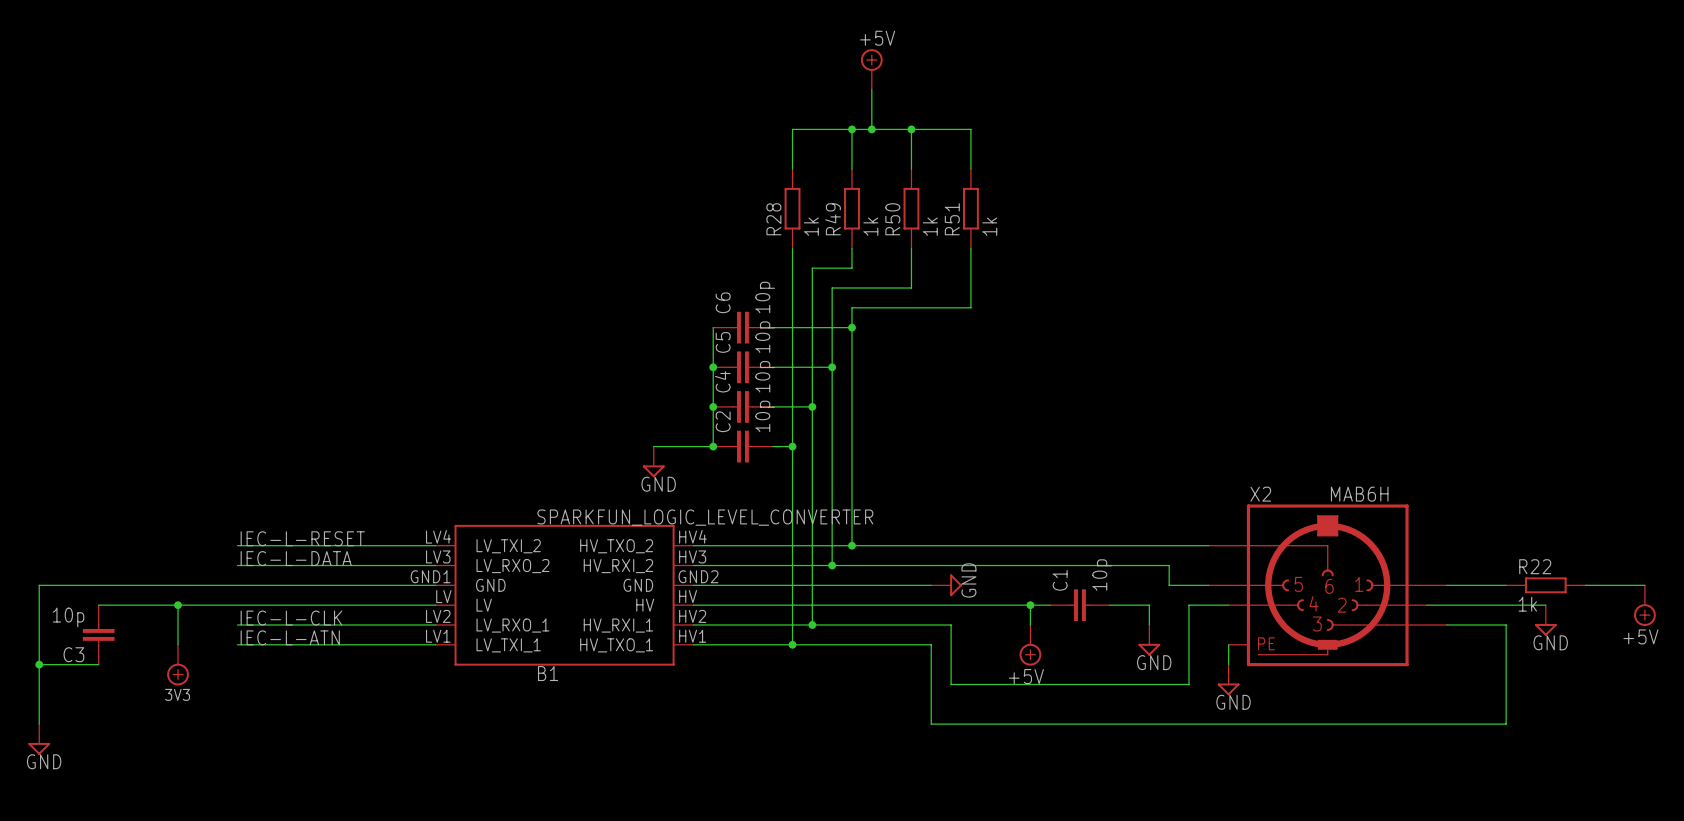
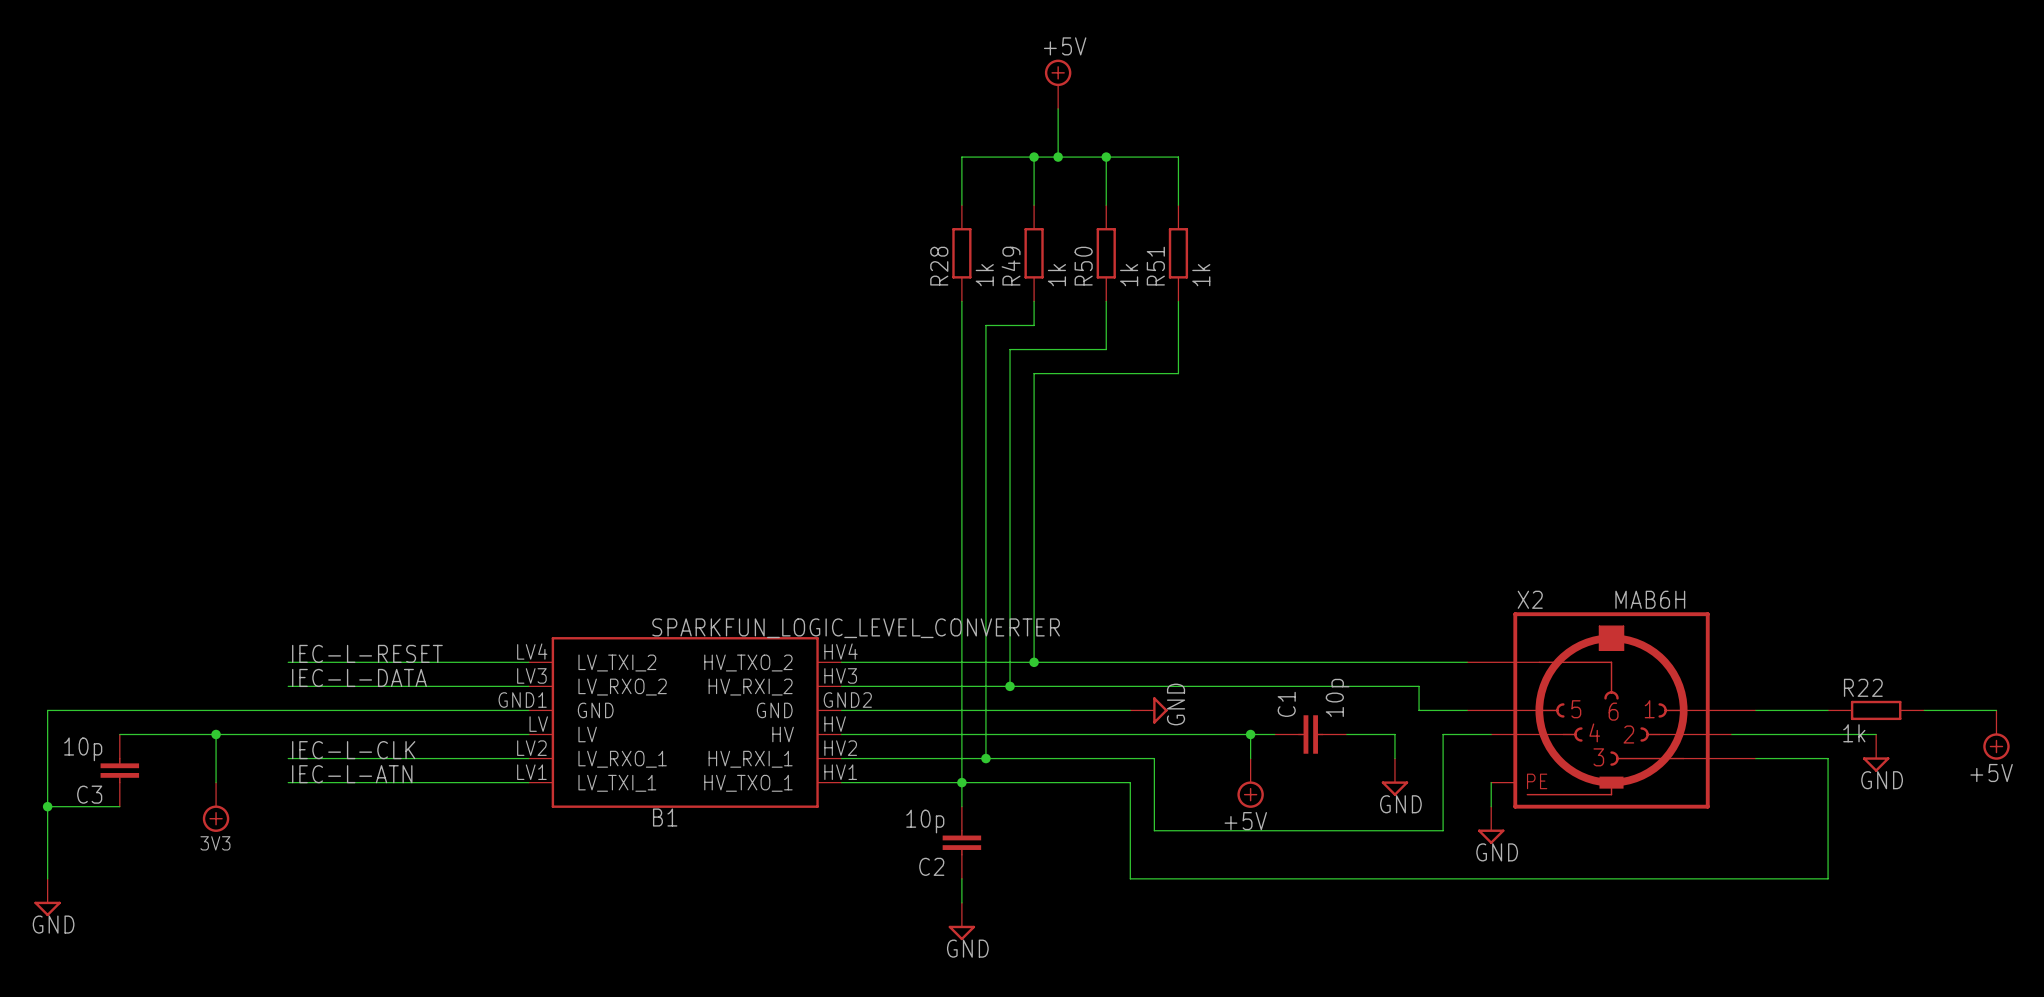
wire: (713, 327) (713, 446) (653, 446) -> none
C6: 10p (742, 327) -> none
wire: (772, 327) (851, 327) -> none
junction: (851, 327) -> none
junction: (713, 367) -> none
C5: 10p (742, 367) -> none
wire: (772, 367) (832, 367) -> none
junction: (832, 367) -> none
junction: (713, 406) -> none
C4: 10p (742, 406) -> none
wire: (772, 406) (812, 406) -> none
junction: (812, 406) -> none
C2 value position: 10p (765, 416) -> 10p (925, 821)
C2 name position: C2 (723, 421) -> C2 (931, 866)
junction: (713, 446) -> none
C2 rotation: 0° (742, 446) -> 90° clockwise (961, 842)
C2 position: (742, 446) -> (961, 842)
wire: (772, 446) (792, 446) -> none
junction: (792, 446) -> none
power symbol: GND (653, 461) -> none
wire: none -> (961, 782) (961, 806)
wire: none -> (961, 878) (961, 902)
power symbol: none -> GND (961, 921)

